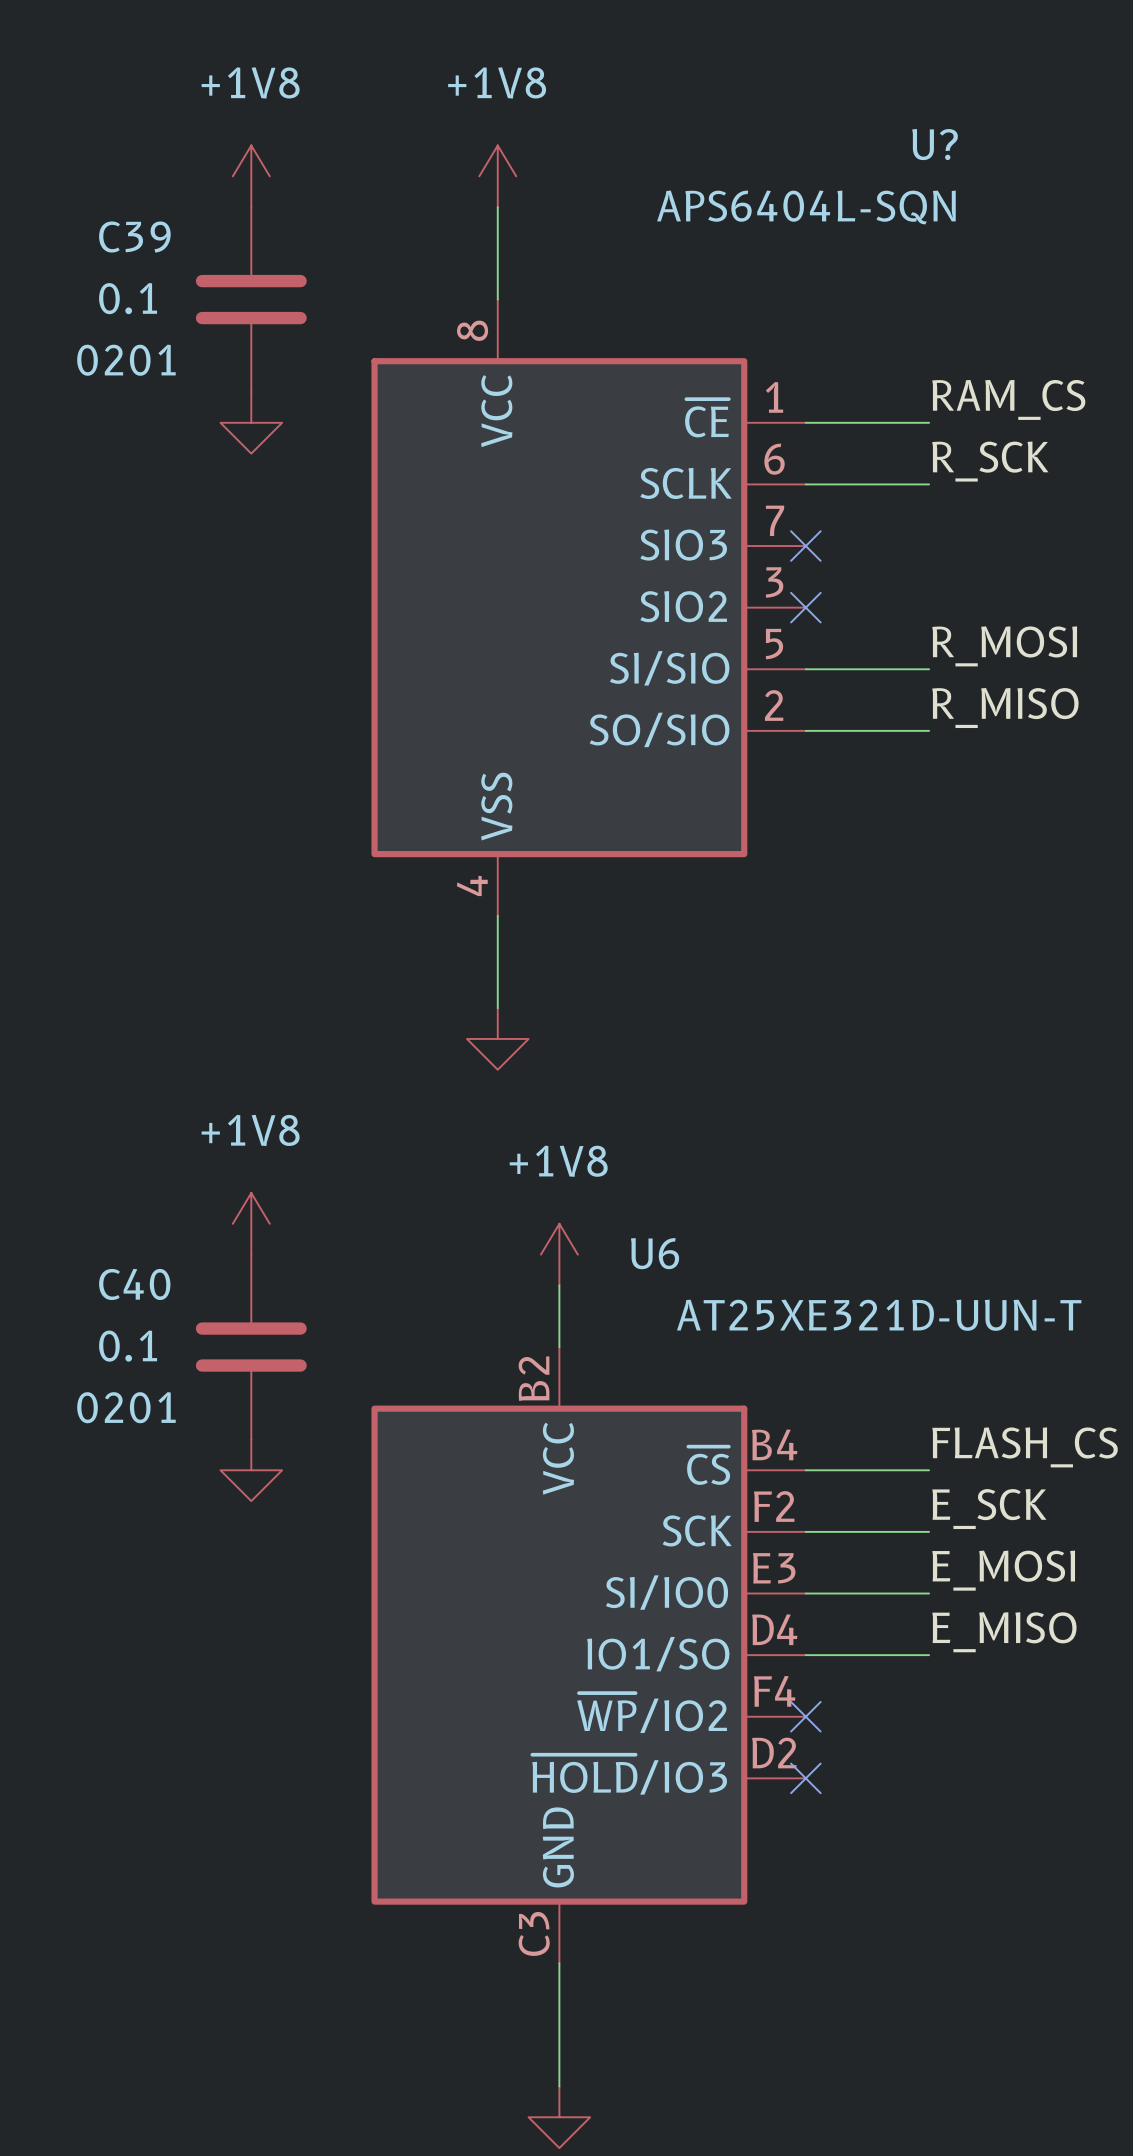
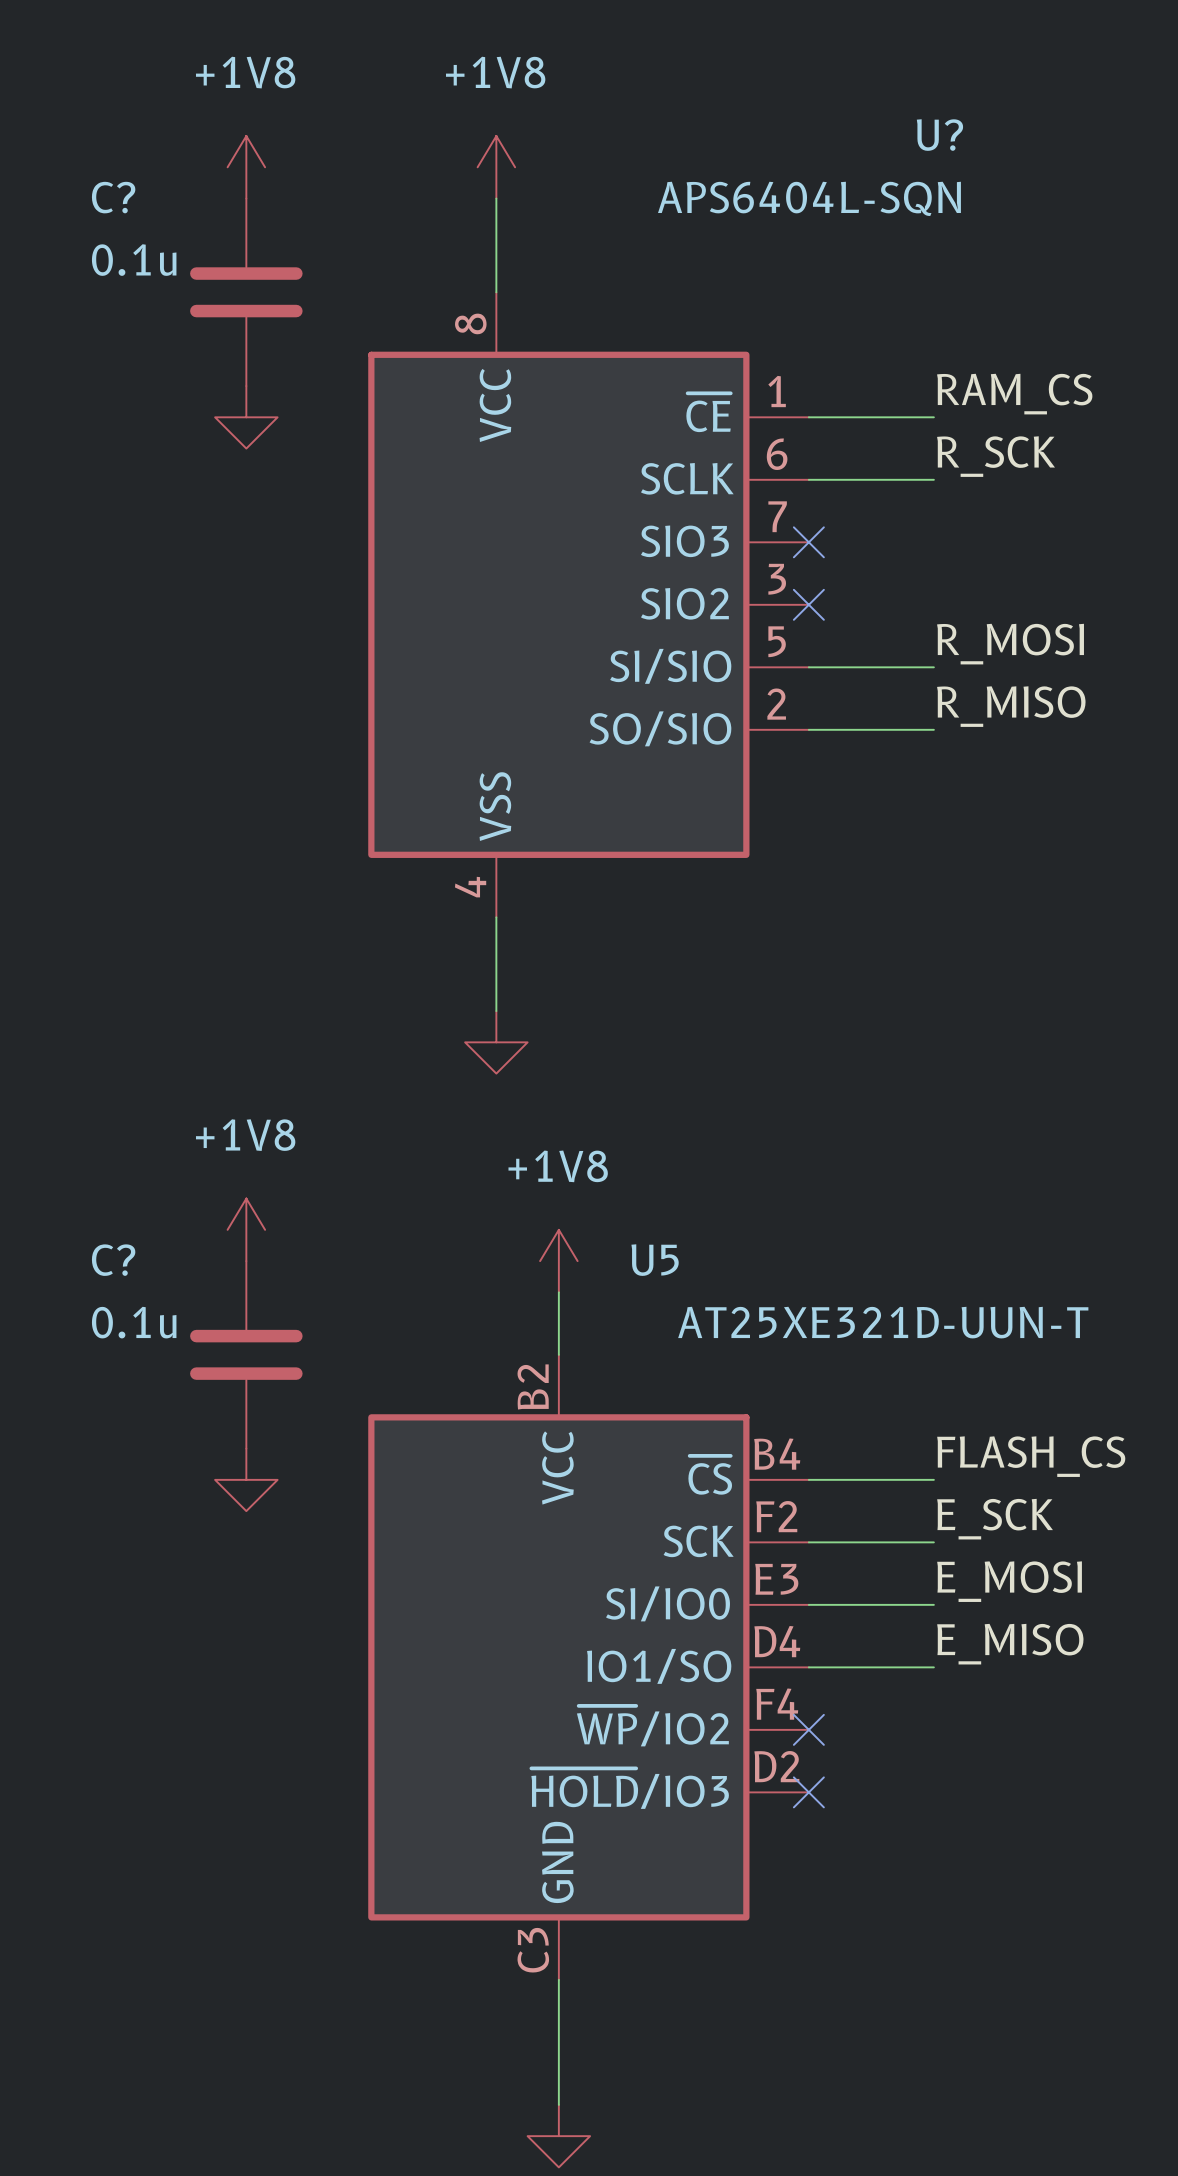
C39 name: C39 (134, 237) -> C? (113, 197)
C39 value: 0.1 (128, 298) -> 0.1u (134, 260)
C39 text: 0201 (126, 360) -> none
U6 name: U6 (655, 1253) -> U5 (655, 1260)
C40 name: C40 (134, 1284) -> C? (113, 1260)
C40 value: 0.1 (128, 1346) -> 0.1u (134, 1322)
C40 text: 0201 (126, 1407) -> none

